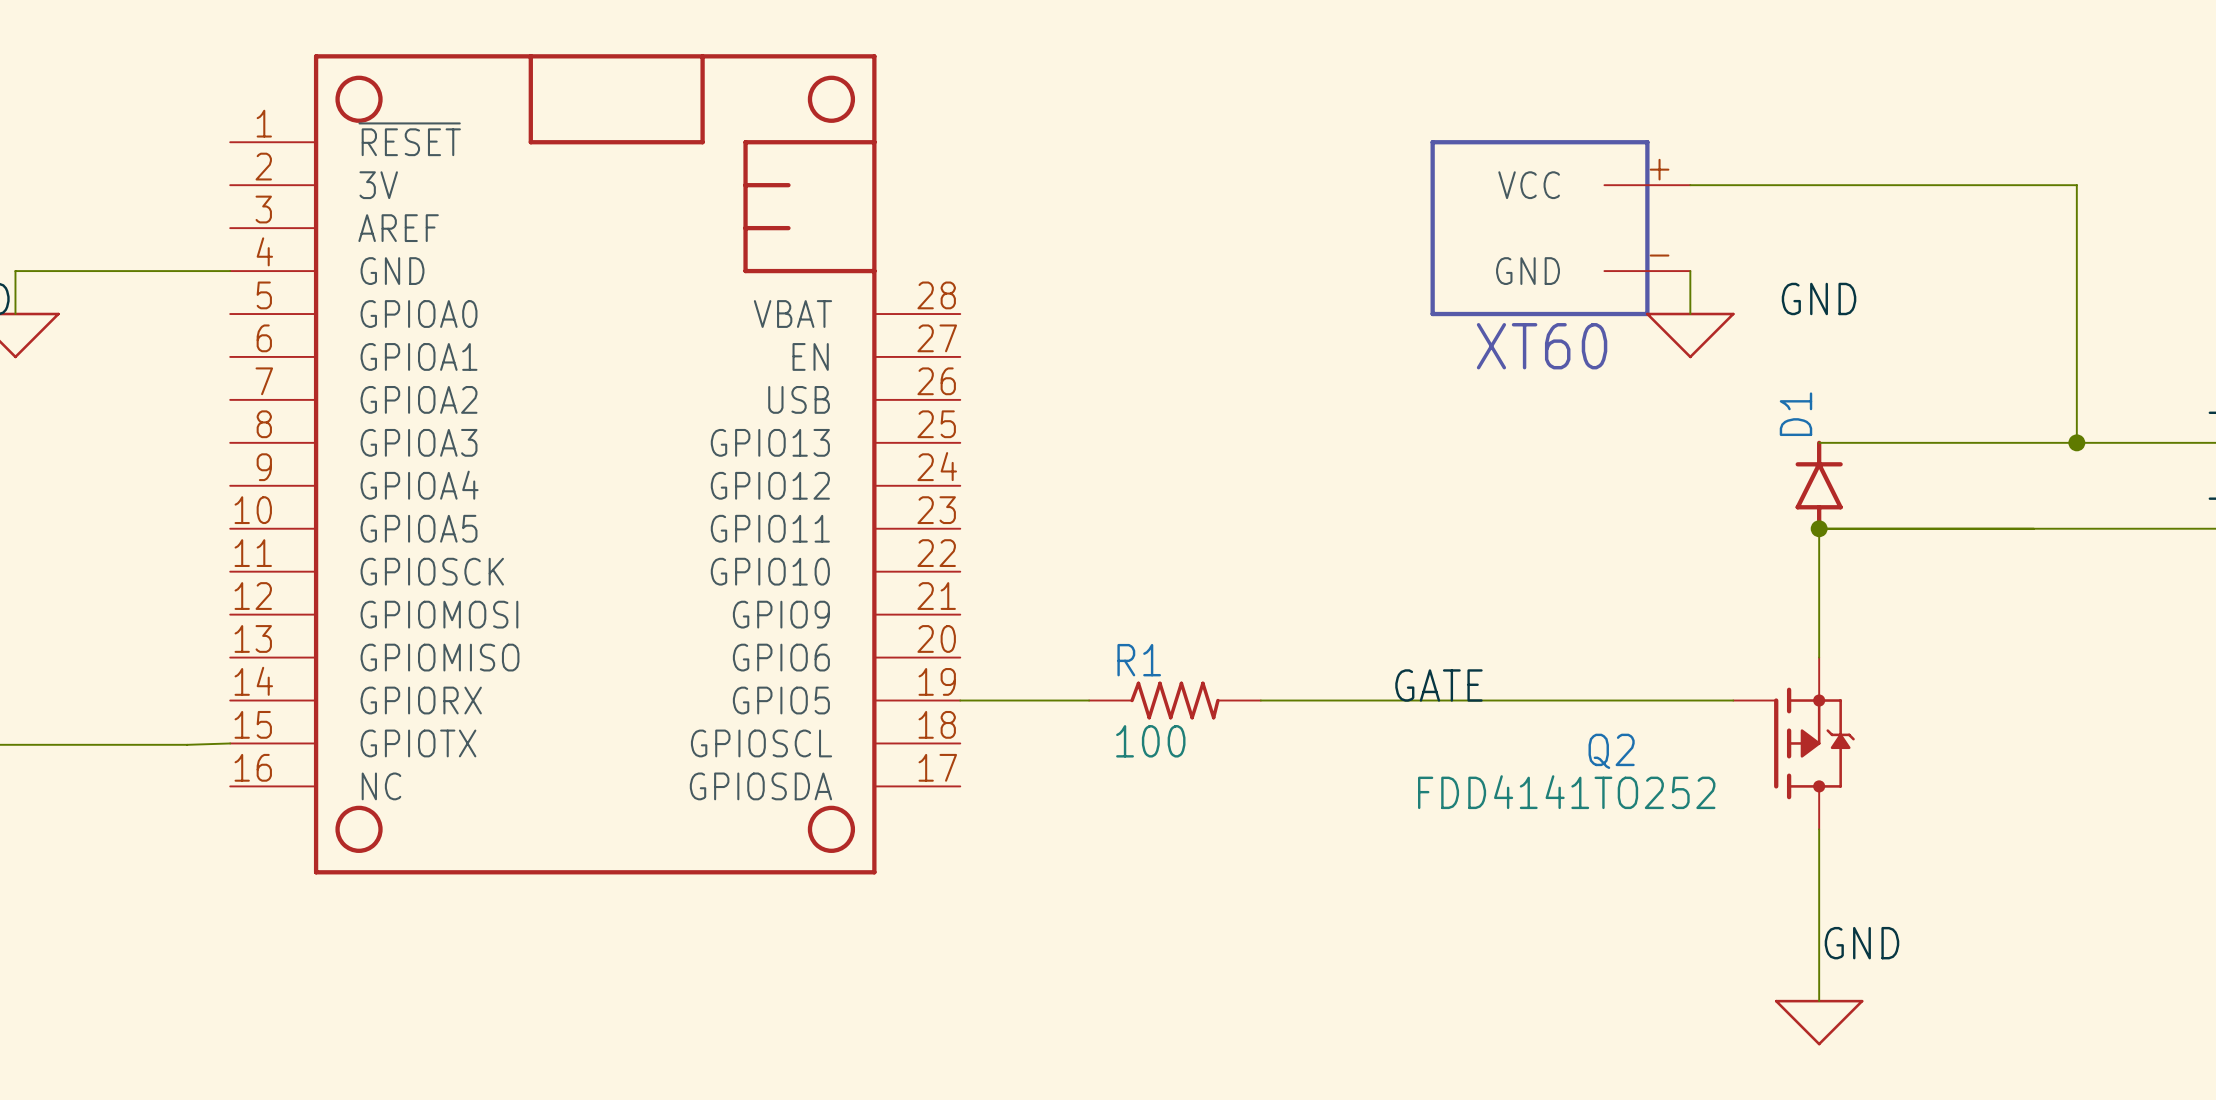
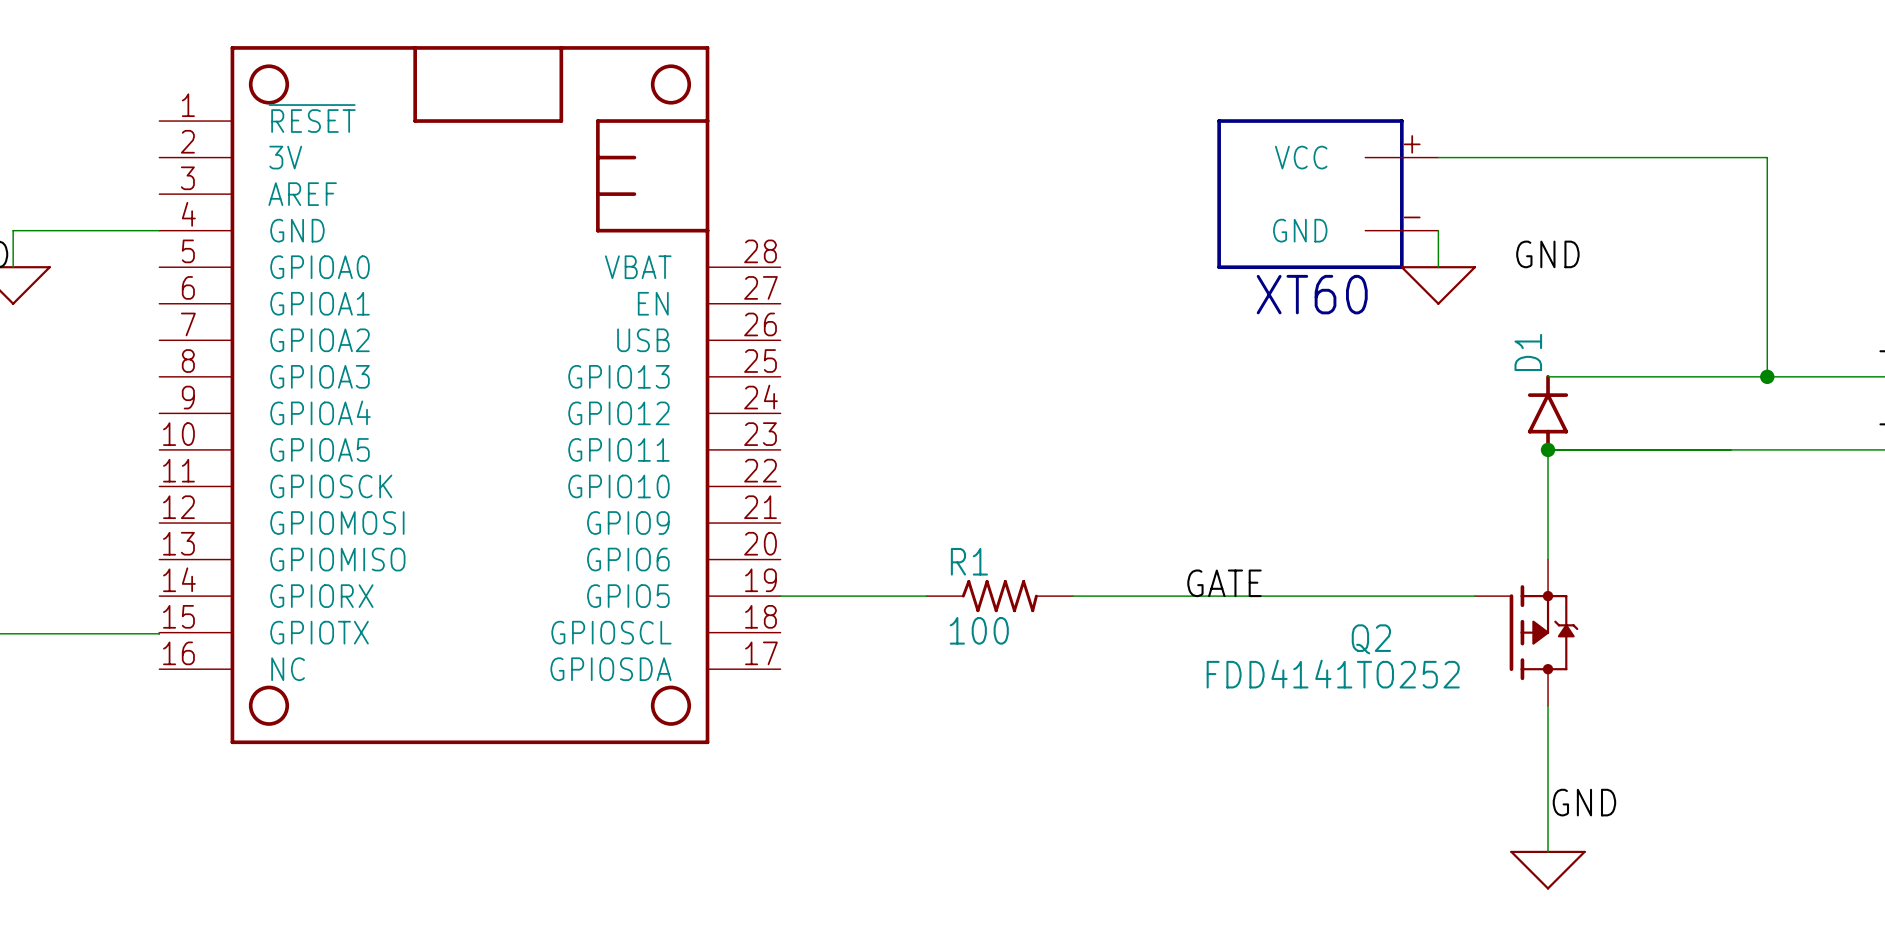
part position: (595, 464) -> (469, 395)

